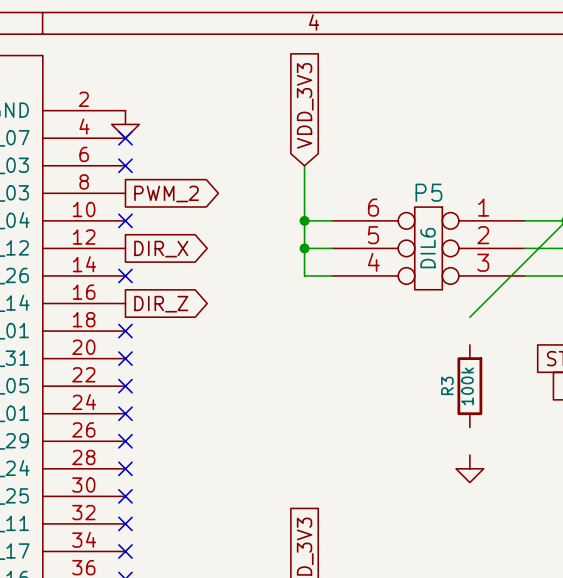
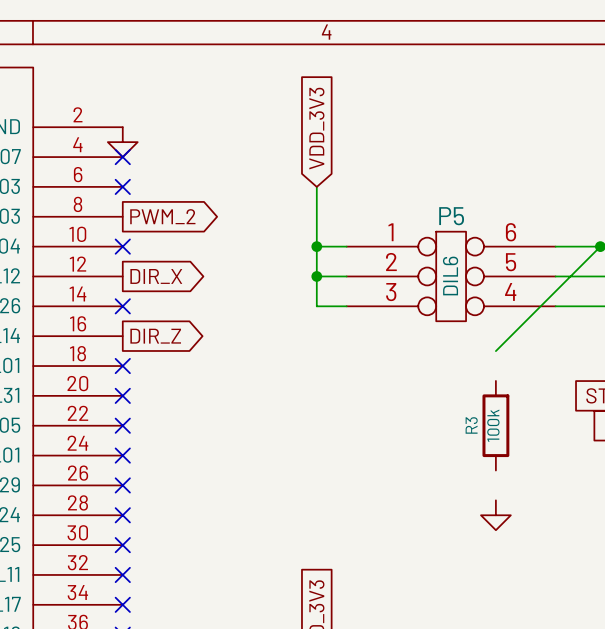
P5 flip: as is (428, 248) -> left-right (451, 276)

